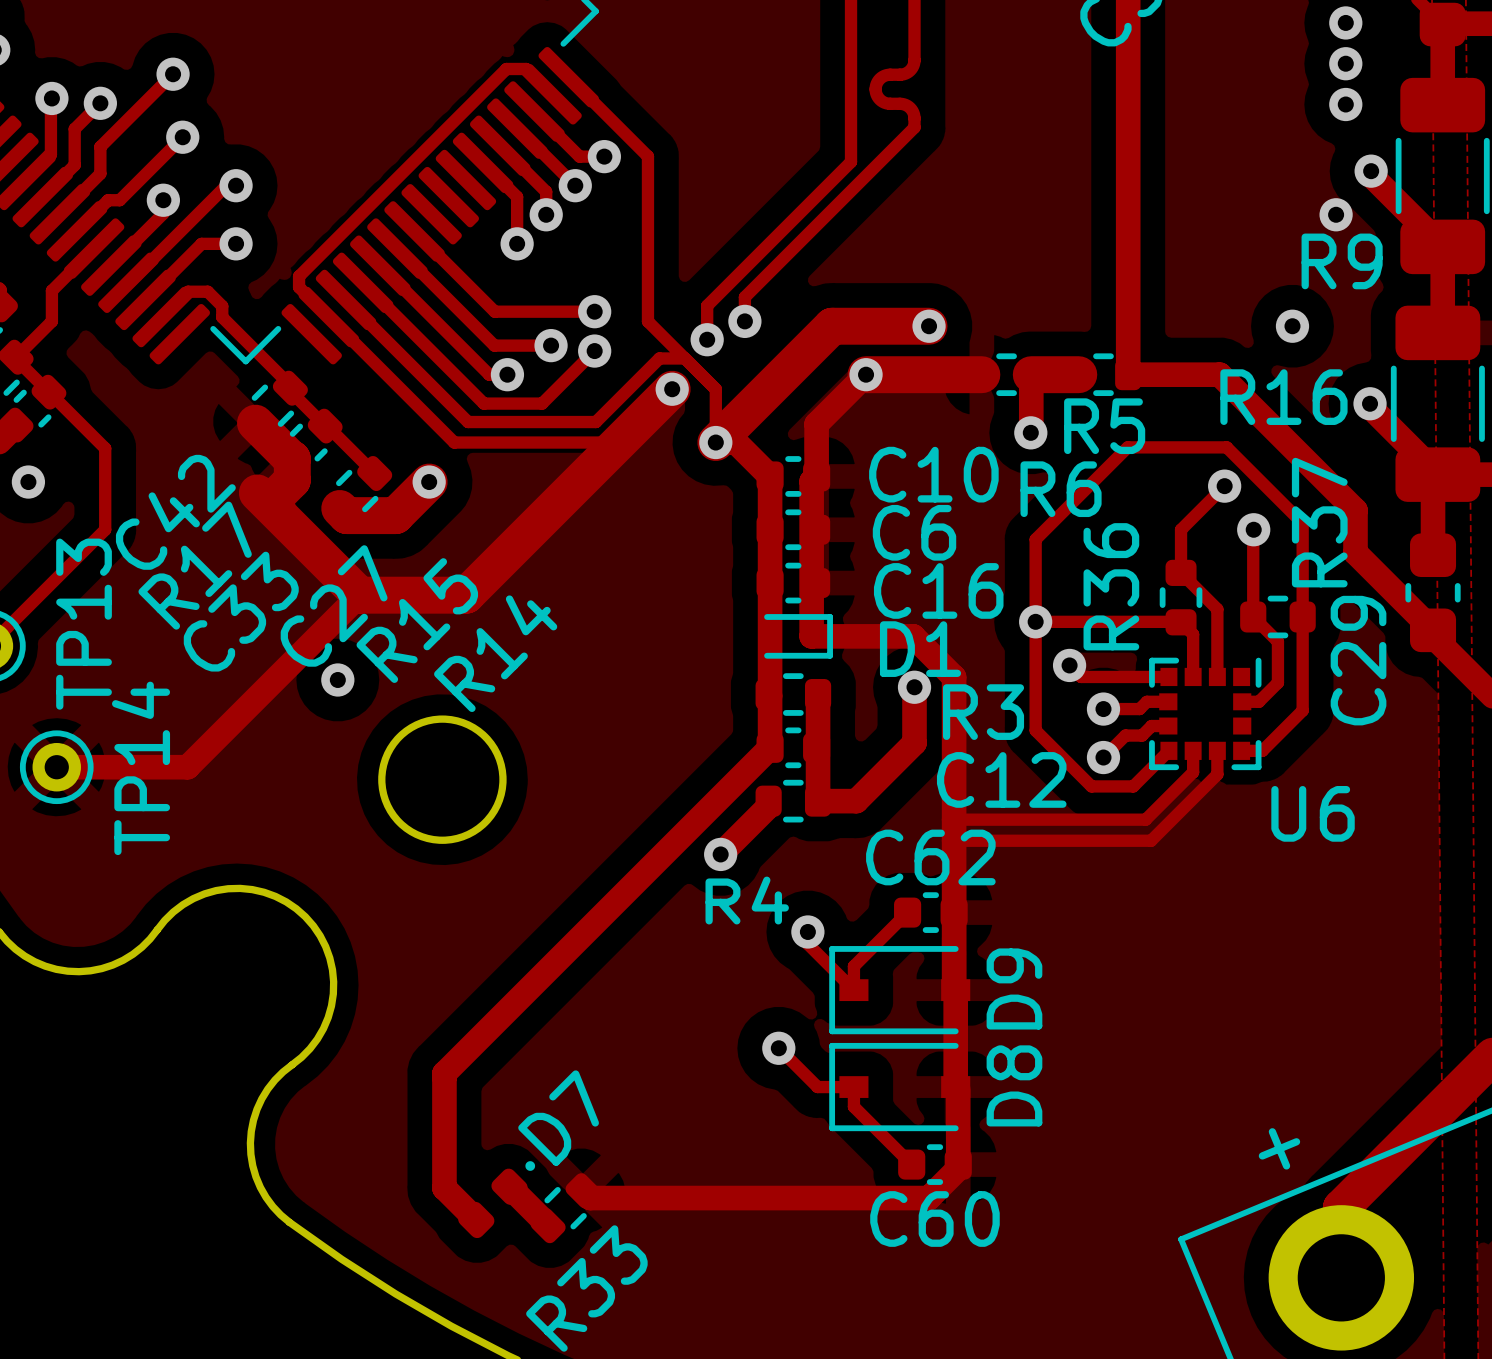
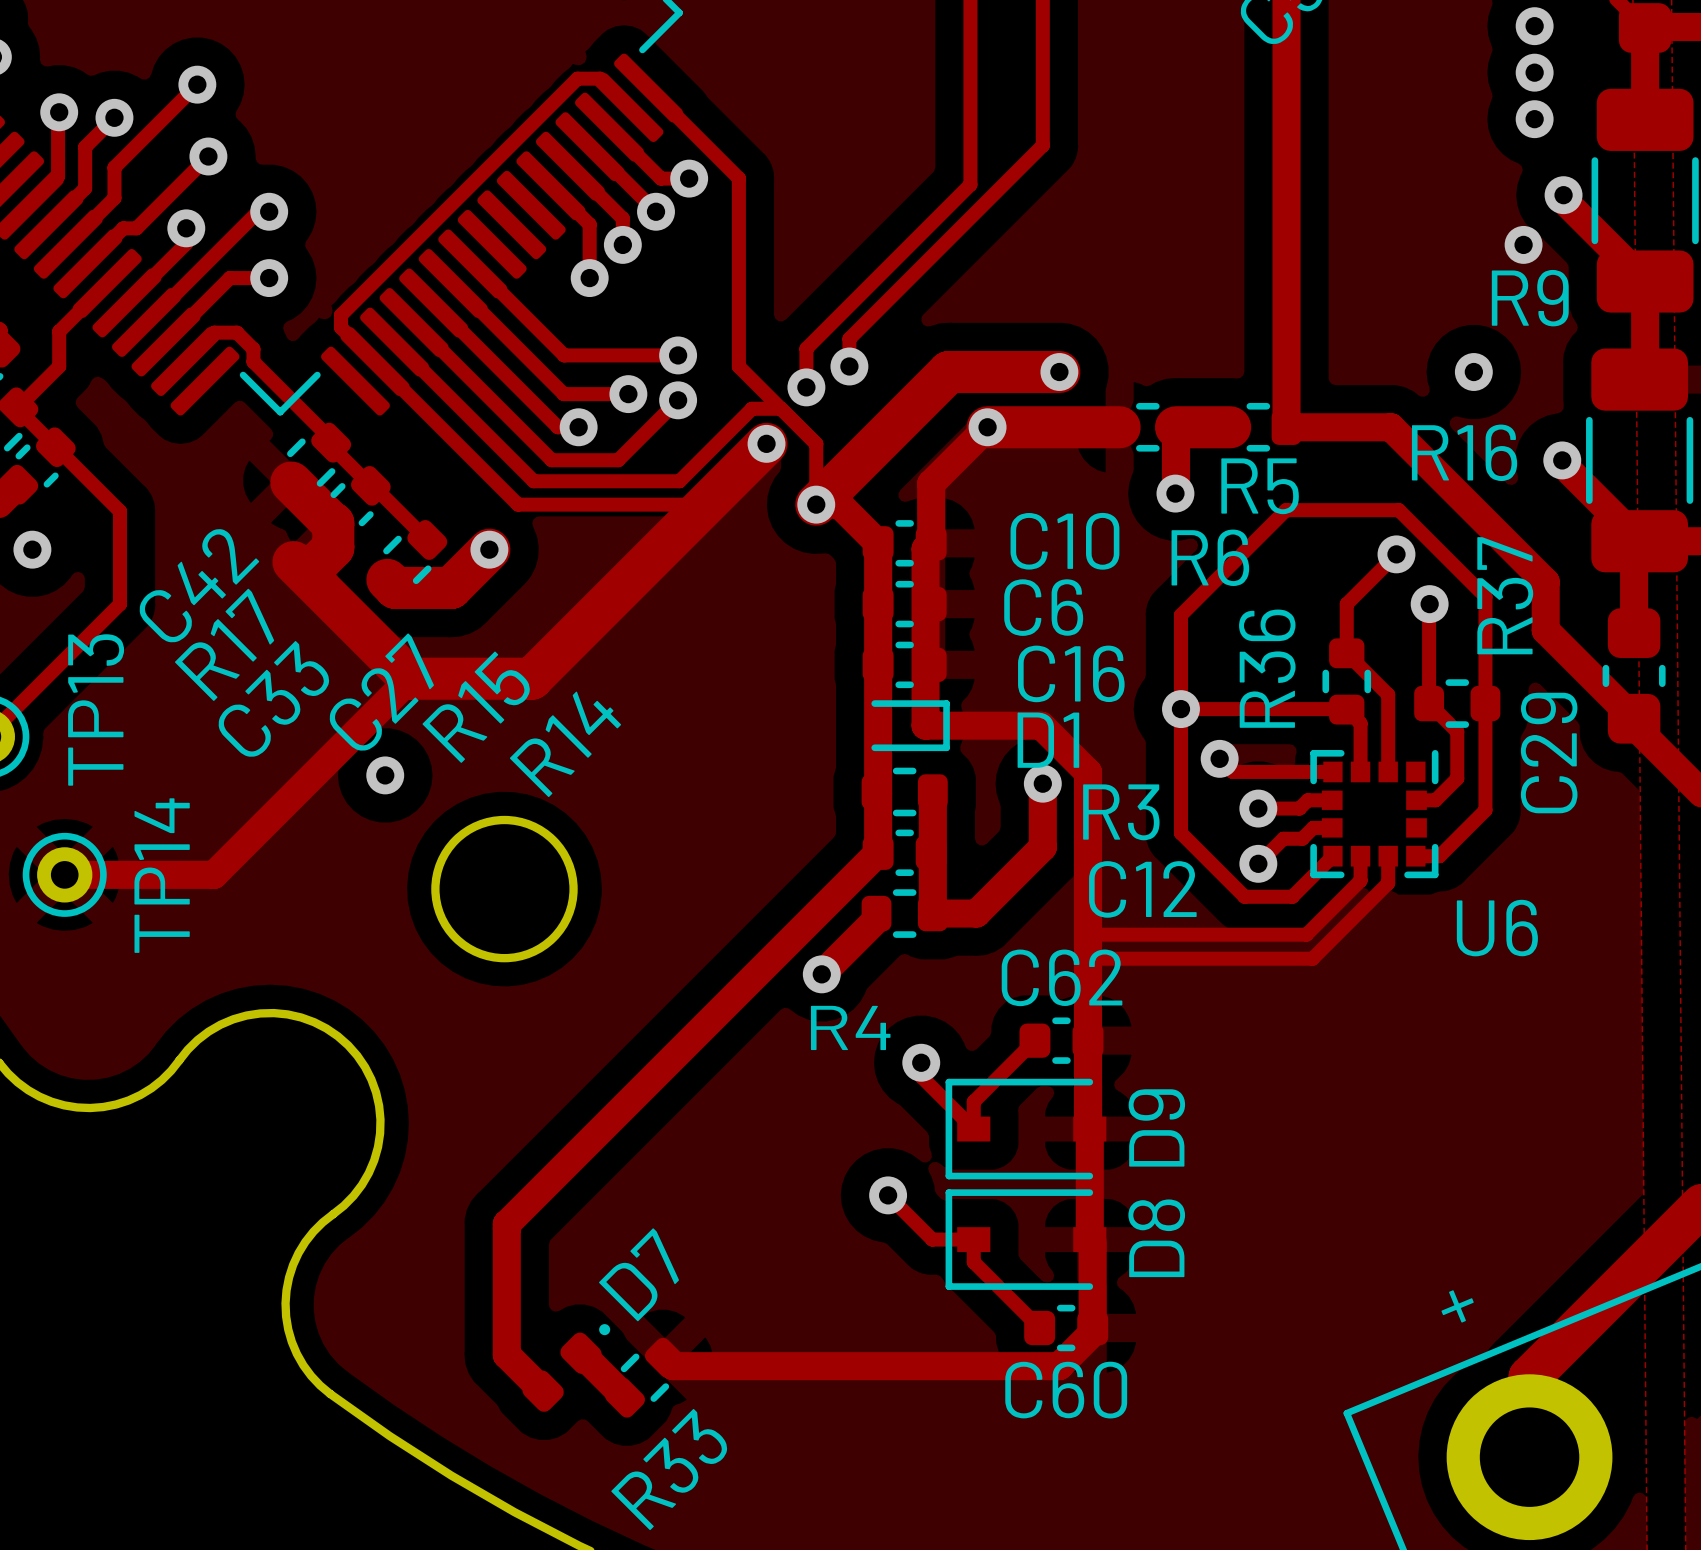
track: (914, 60) (912, 67) (907, 72) (888, 74) (881, 77) (875, 89) (881, 100) (888, 103) (907, 105) (912, 111) (914, 118) -> (1042, 68) (1042, 134)

